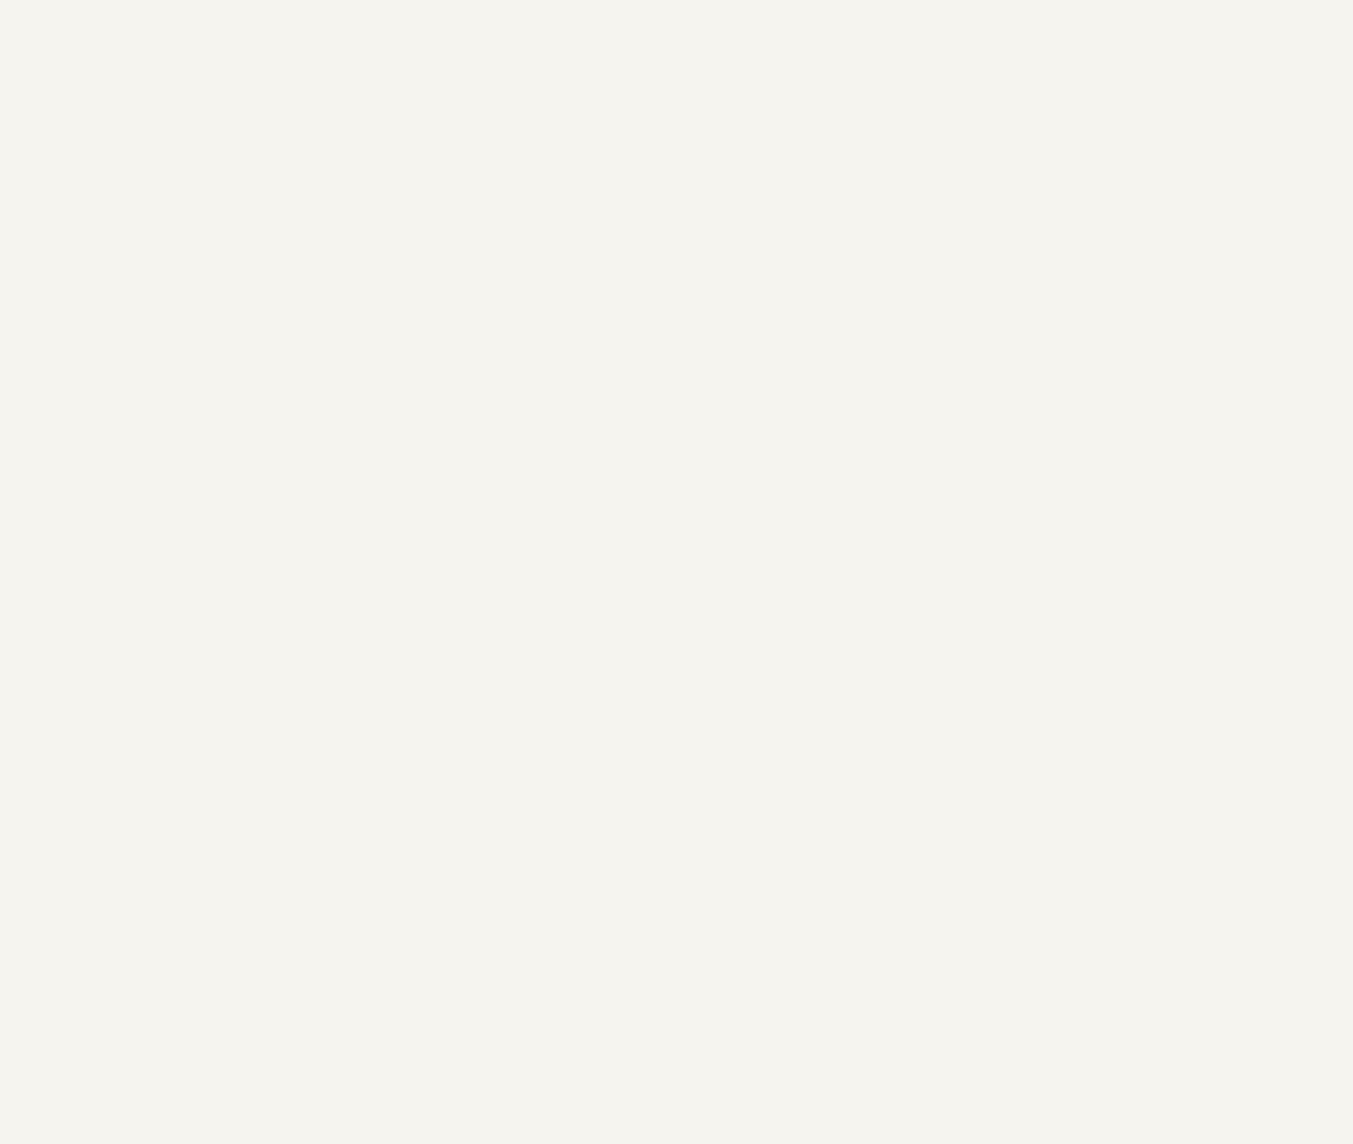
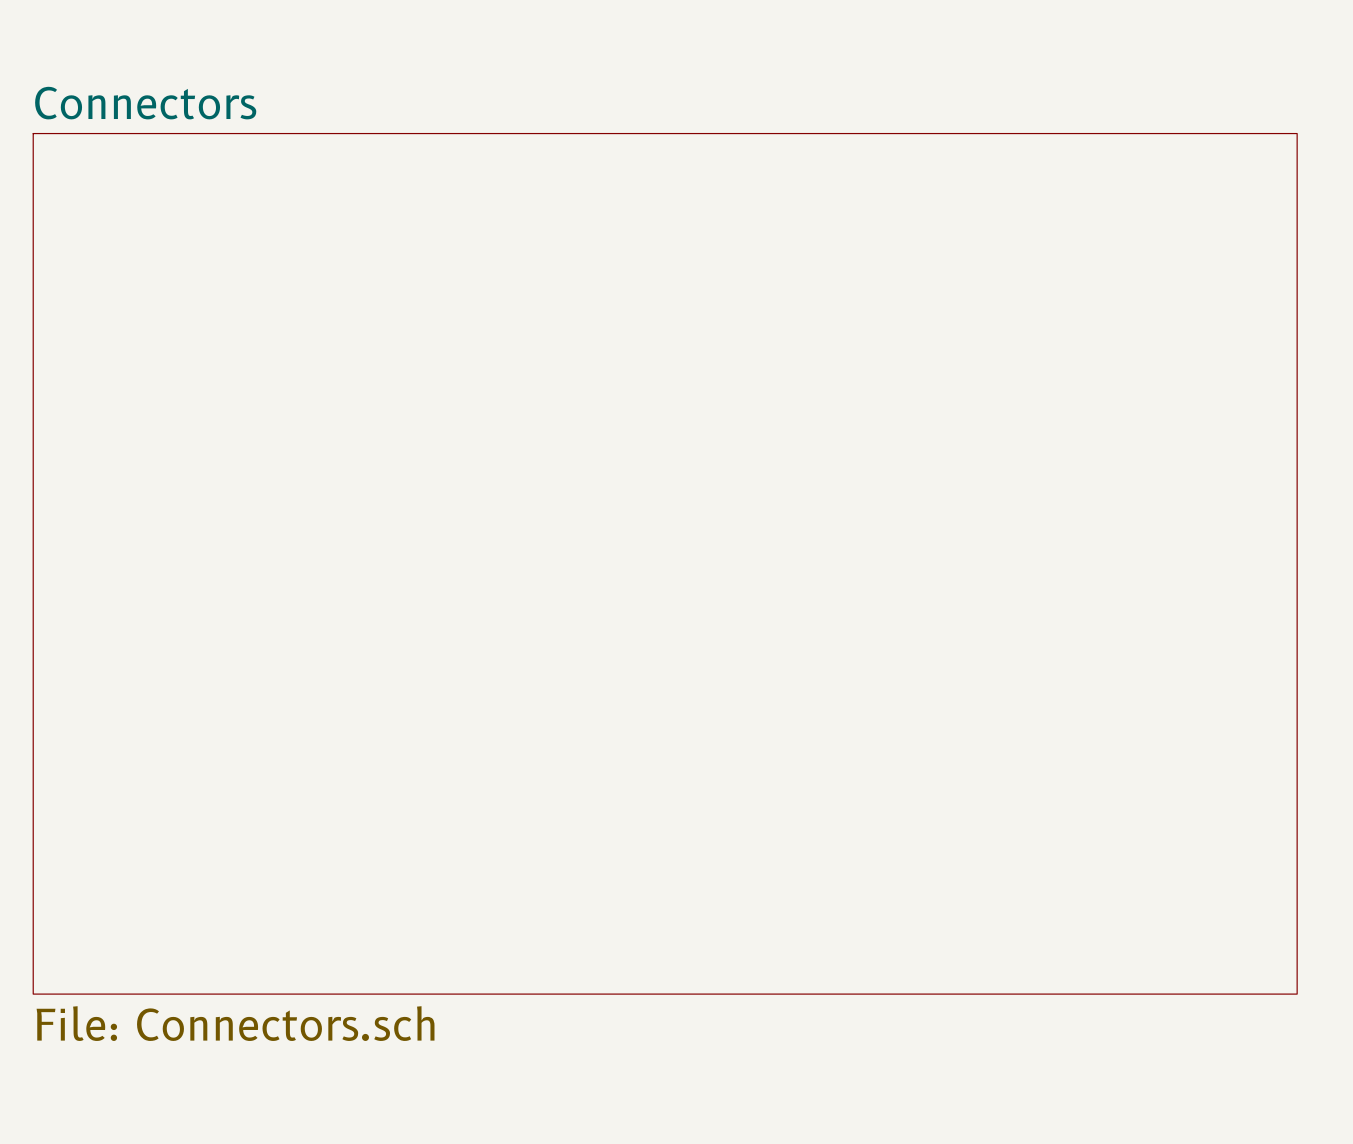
sheet Connectors: none -> File: Connectors.sch (665, 563)

